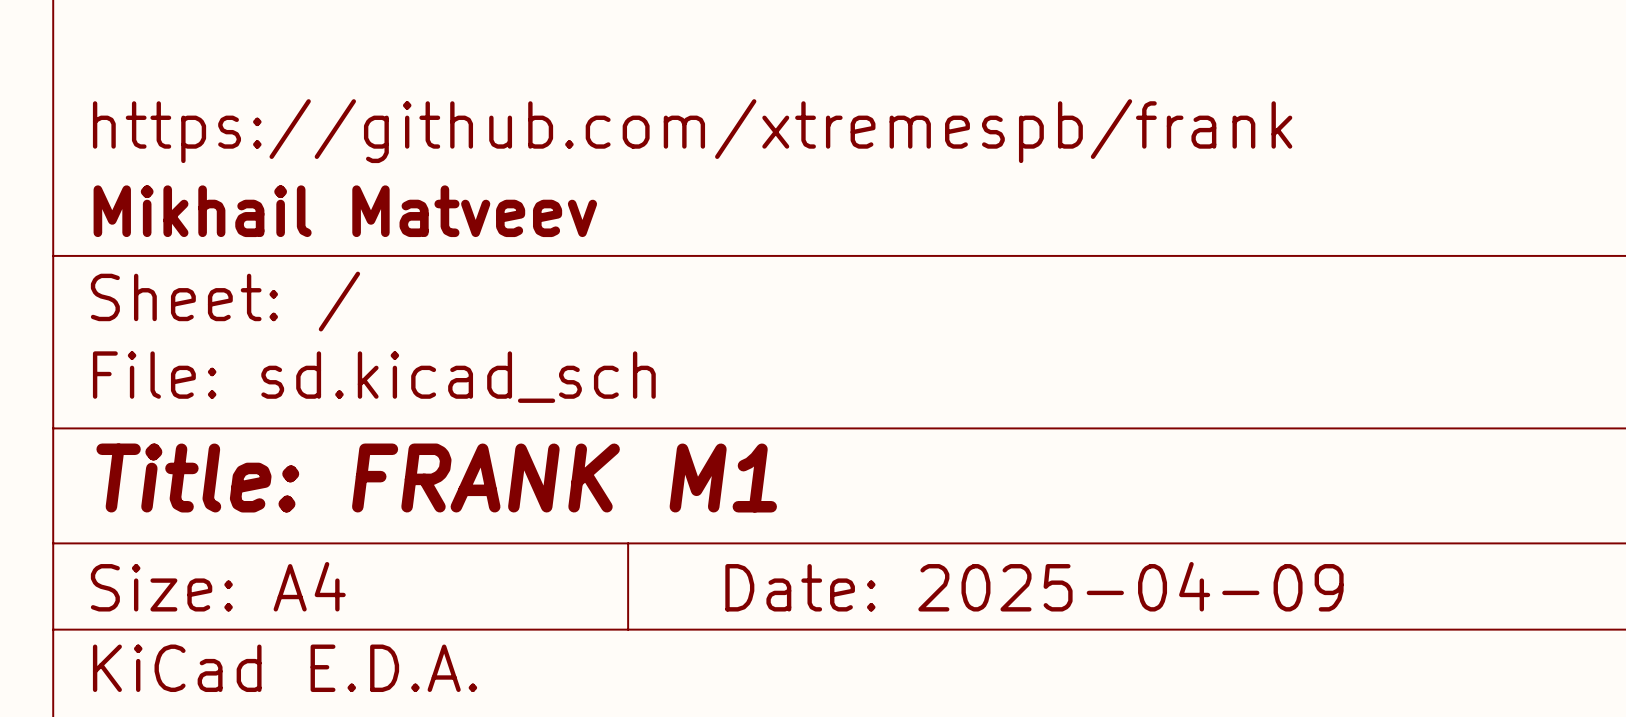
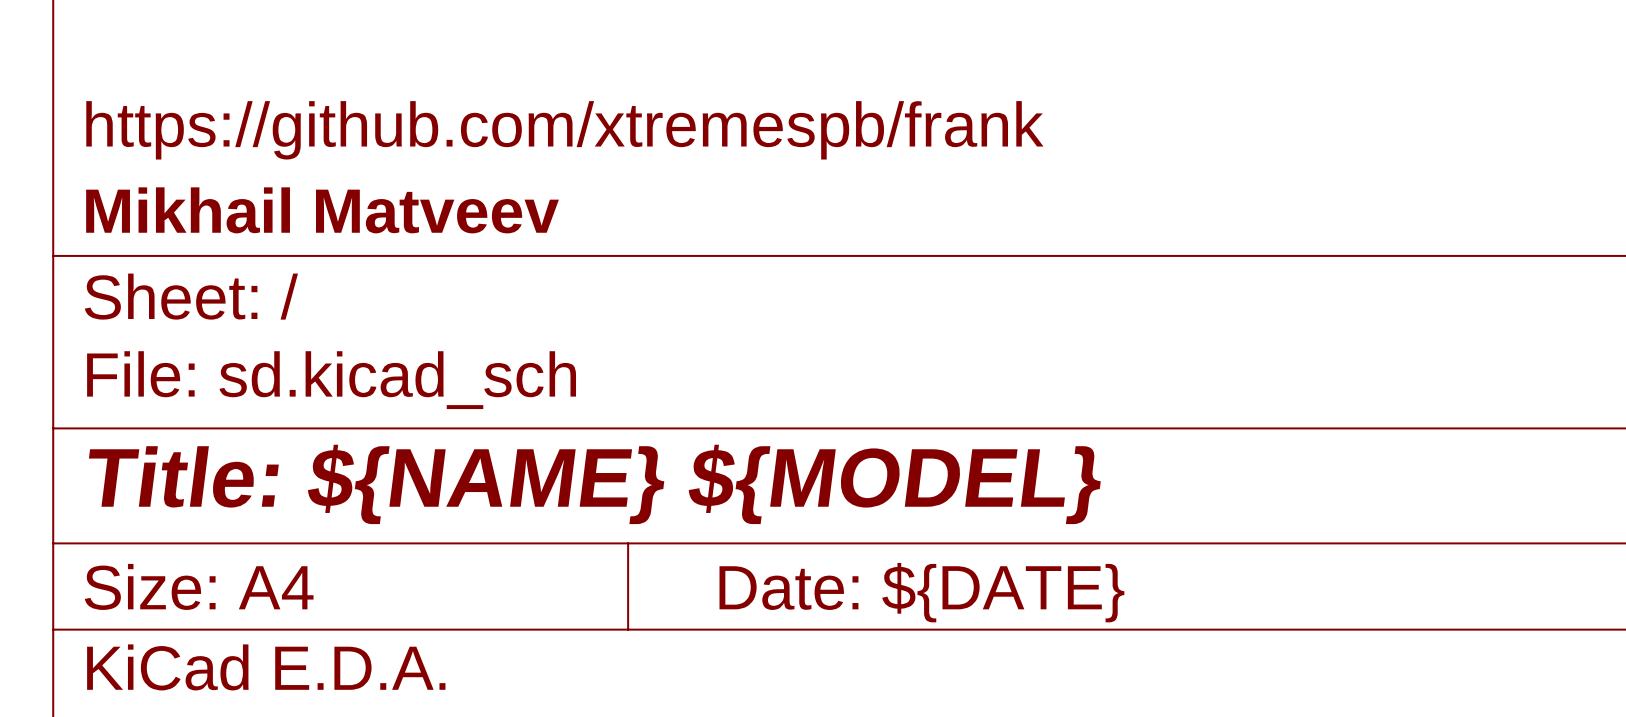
title block: Title: FRANK M1 (436, 478) -> Title: ${NAME} ${MODEL} (594, 484)
title block: Date: 2025-04-09 (1034, 586) -> Date: ${DATE} (921, 592)

